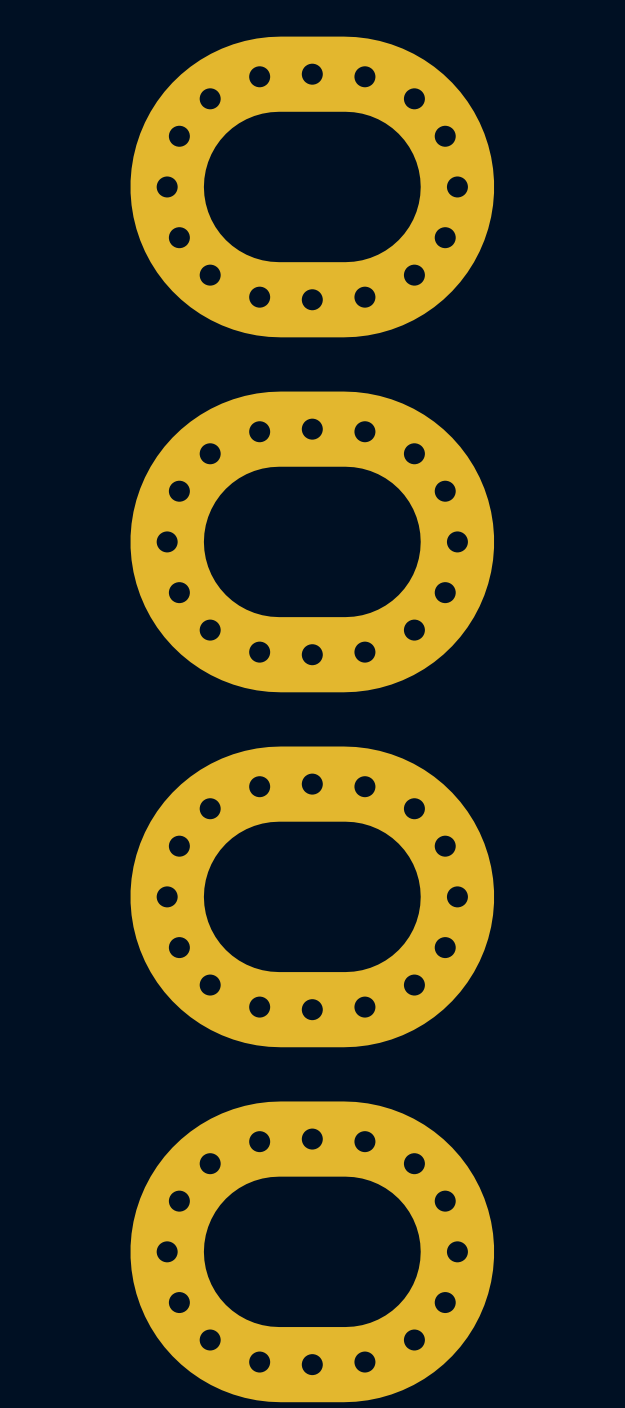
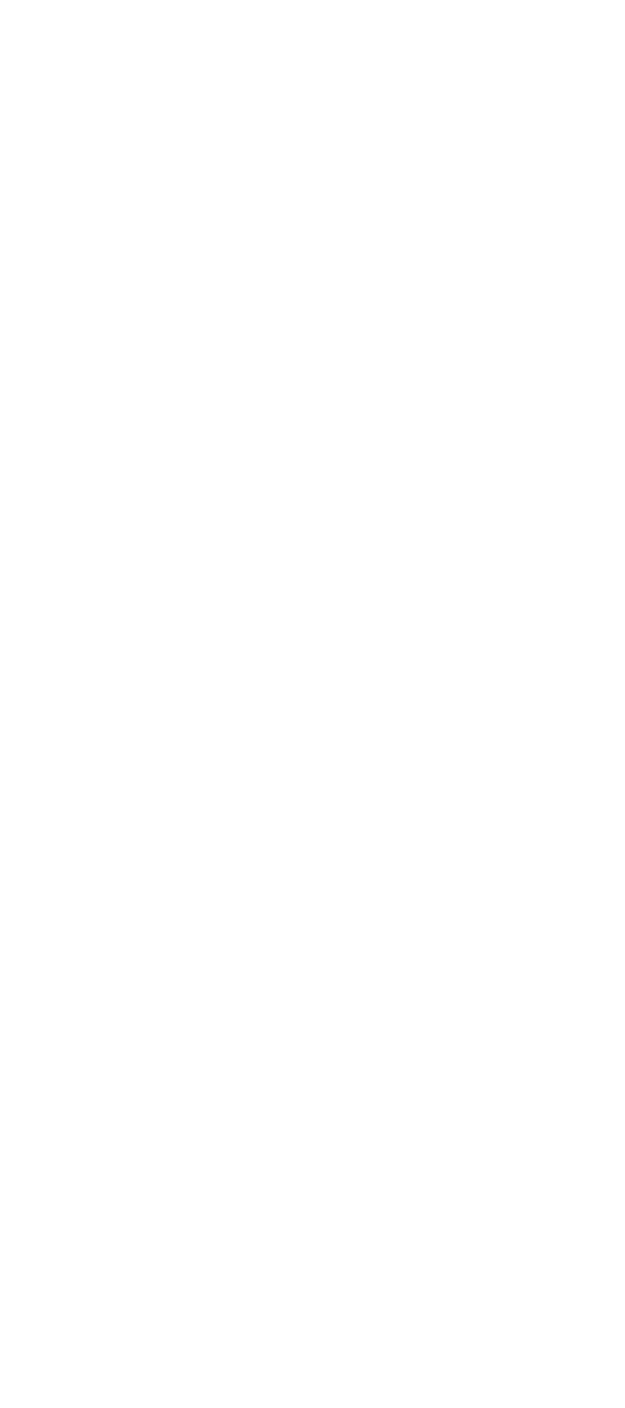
part: (312, 186) -> none
part: (312, 541) -> none
part: (312, 896) -> none
part: (312, 1251) -> none

